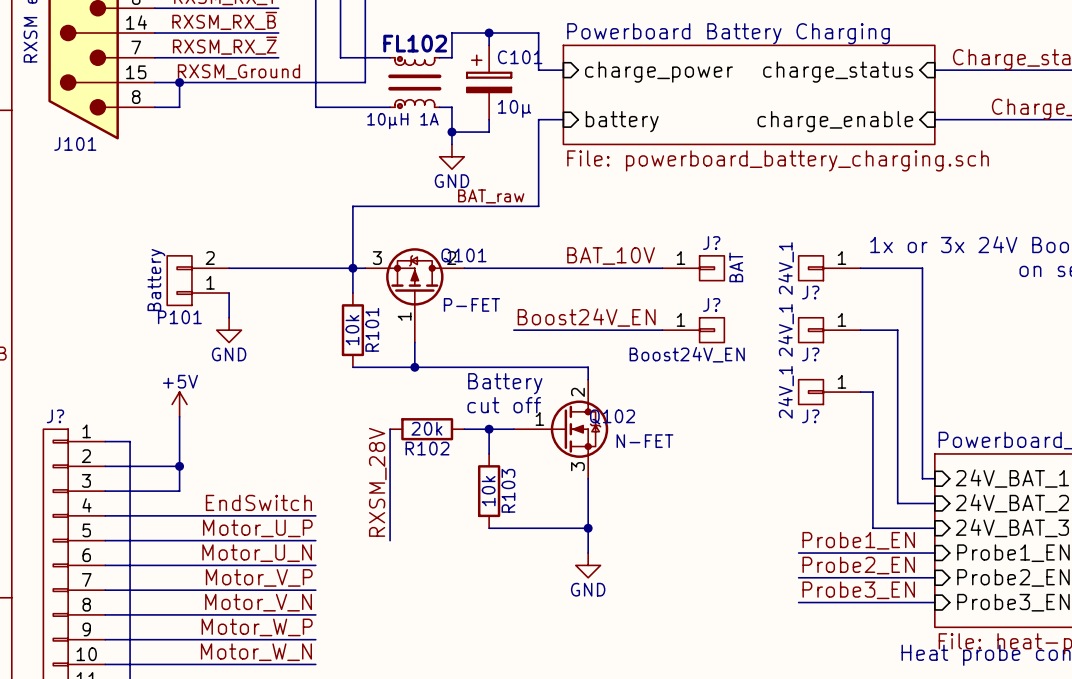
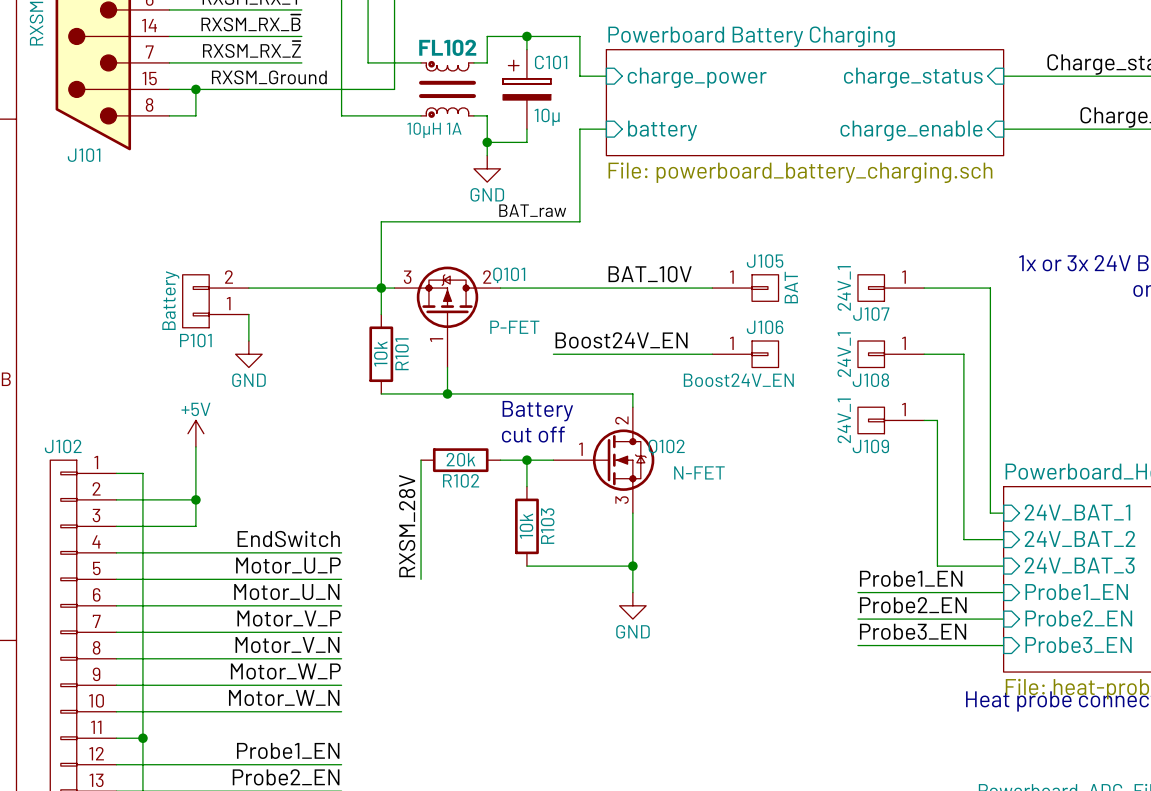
J? name: J? (711, 243) -> J105 (765, 261)
J? name: J? (810, 292) -> J107 (871, 314)
J? name: J? (711, 304) -> J106 (765, 327)
J? name: J? (810, 354) -> J108 (870, 380)
J? name: J? (55, 416) -> J102 (63, 446)
J? name: J? (810, 416) -> J109 (870, 446)

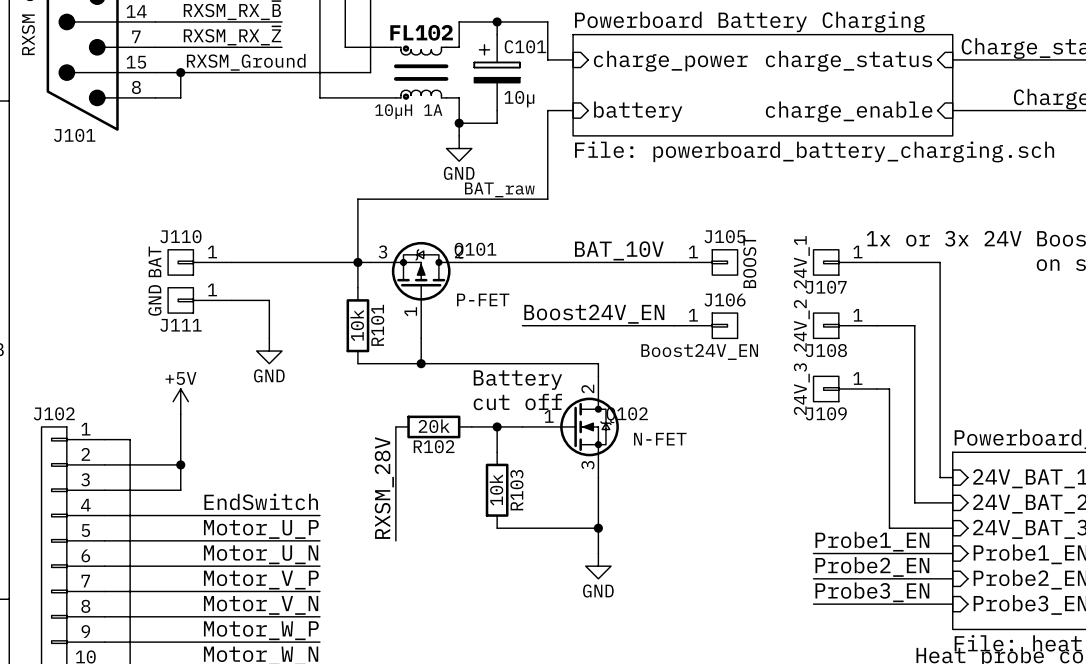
J105 value: BAT (791, 287) -> BOOST (749, 261)
J110: none -> BAT (199, 262)
P101: Battery (215, 301) -> none
wire: (248, 314) (248, 341) -> none
J111: none -> GND (199, 300)
wire: none -> (231, 300) (269, 300) (269, 338)
power symbol position: GND (248, 354) -> GND (269, 351)
J108 value: 24V_1 (844, 354) -> 24V_2 (801, 325)
J109 value: 24V_1 (844, 420) -> 24V_3 (801, 389)

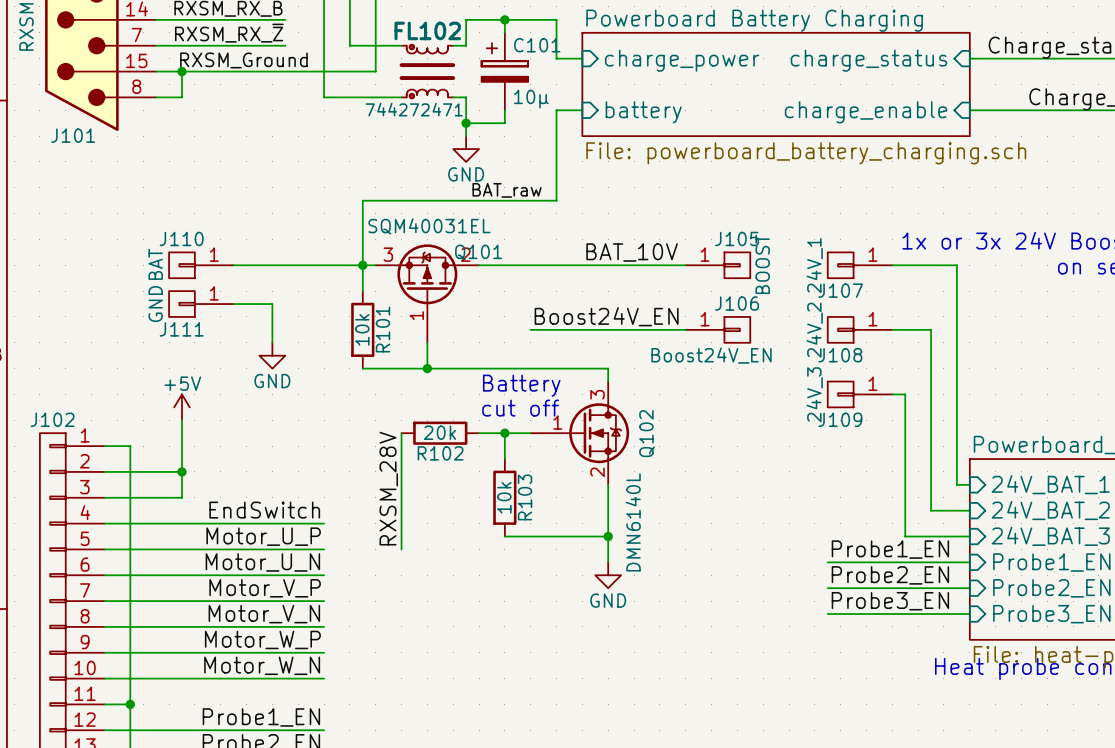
FL102 value: 10µH 1A (408, 111) -> 744272471 (414, 109)
Q101 value: P-FET (483, 299) -> SQM40031EL (429, 226)
Q102 pin number: 2 (587, 388) -> 3 (597, 394)
Q102 name rotation: 0° (627, 415) -> 90° counterclockwise (647, 433)
Q102 value: N-FET (660, 439) -> DMN6140L (633, 522)
Q102 pin number: 3 (587, 465) -> 2 (597, 472)

